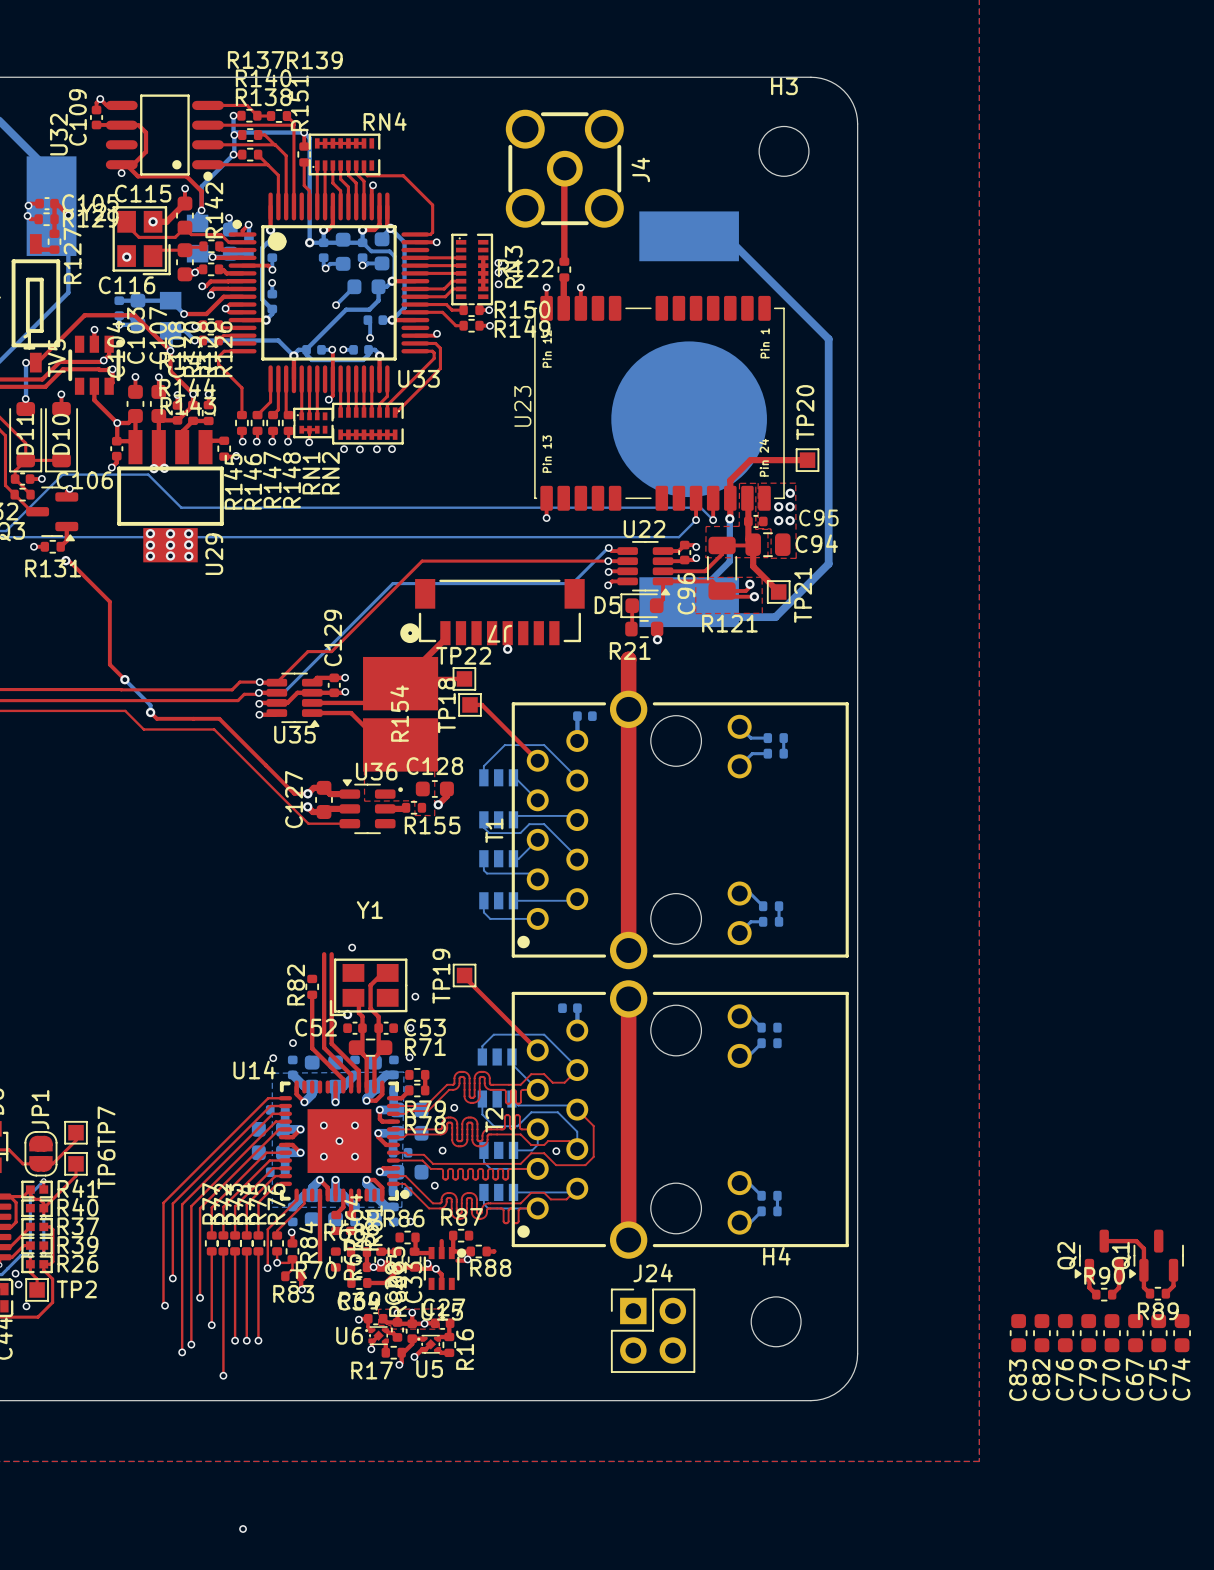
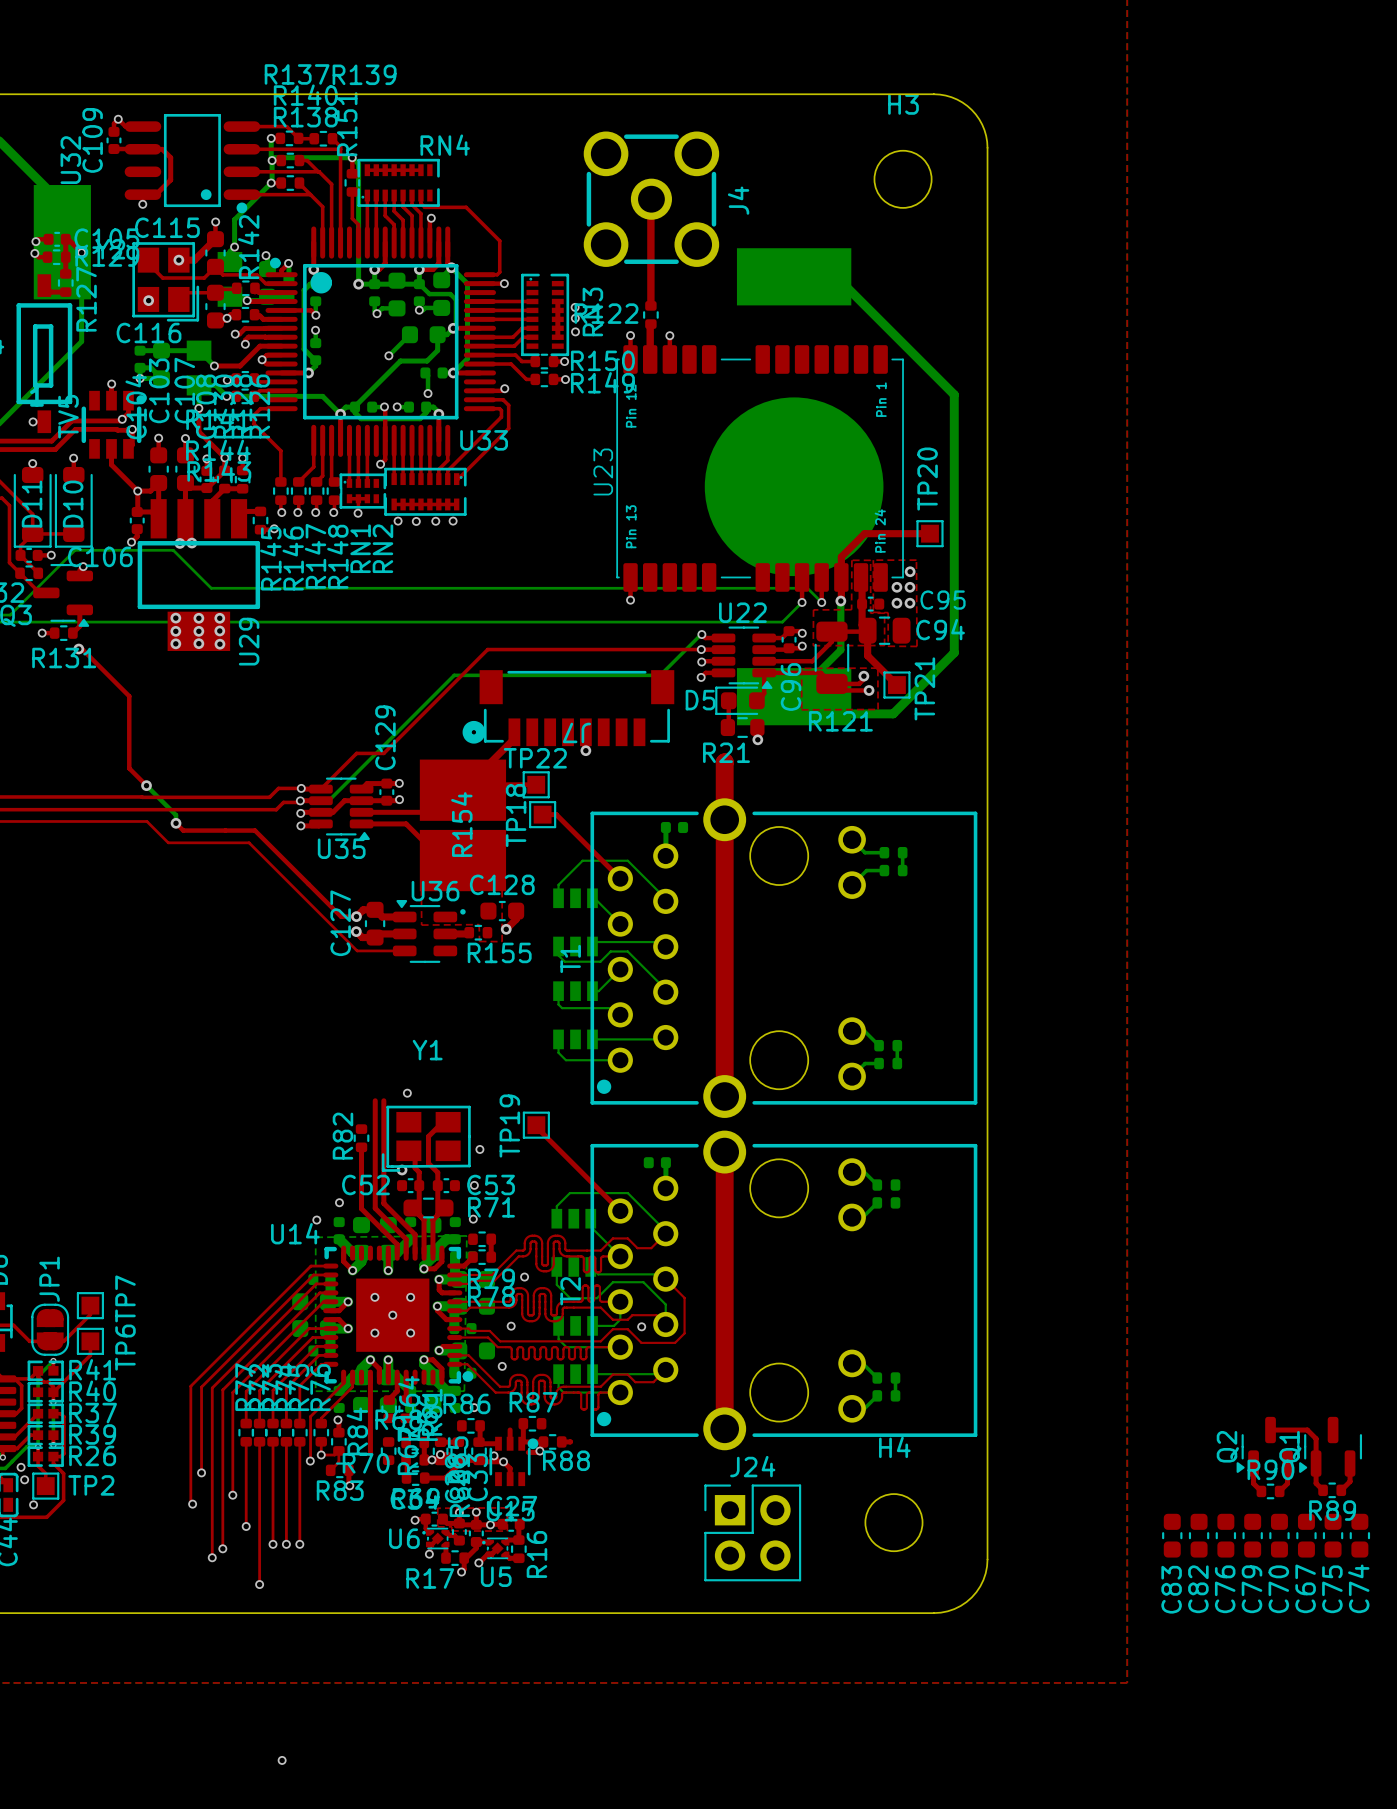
top track: (121, 164) (126, 164) (137, 176) (186, 176) (201, 191) (201, 210) -> none
top track: (170, 350) (134, 315) (84, 315) (35, 362) -> none
bottom track: (26, 362) (25, 399) -> none

